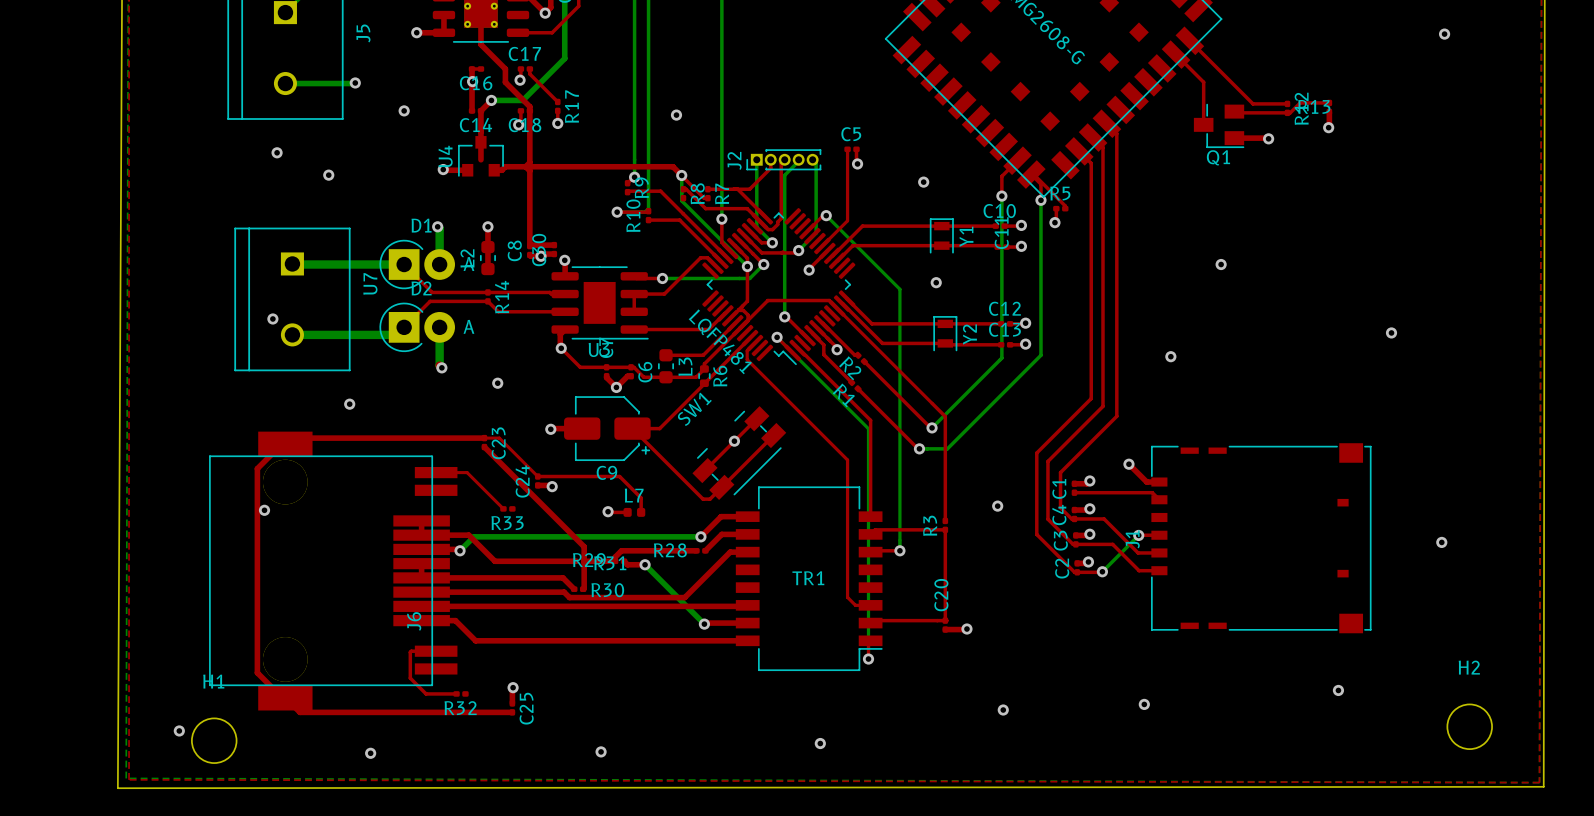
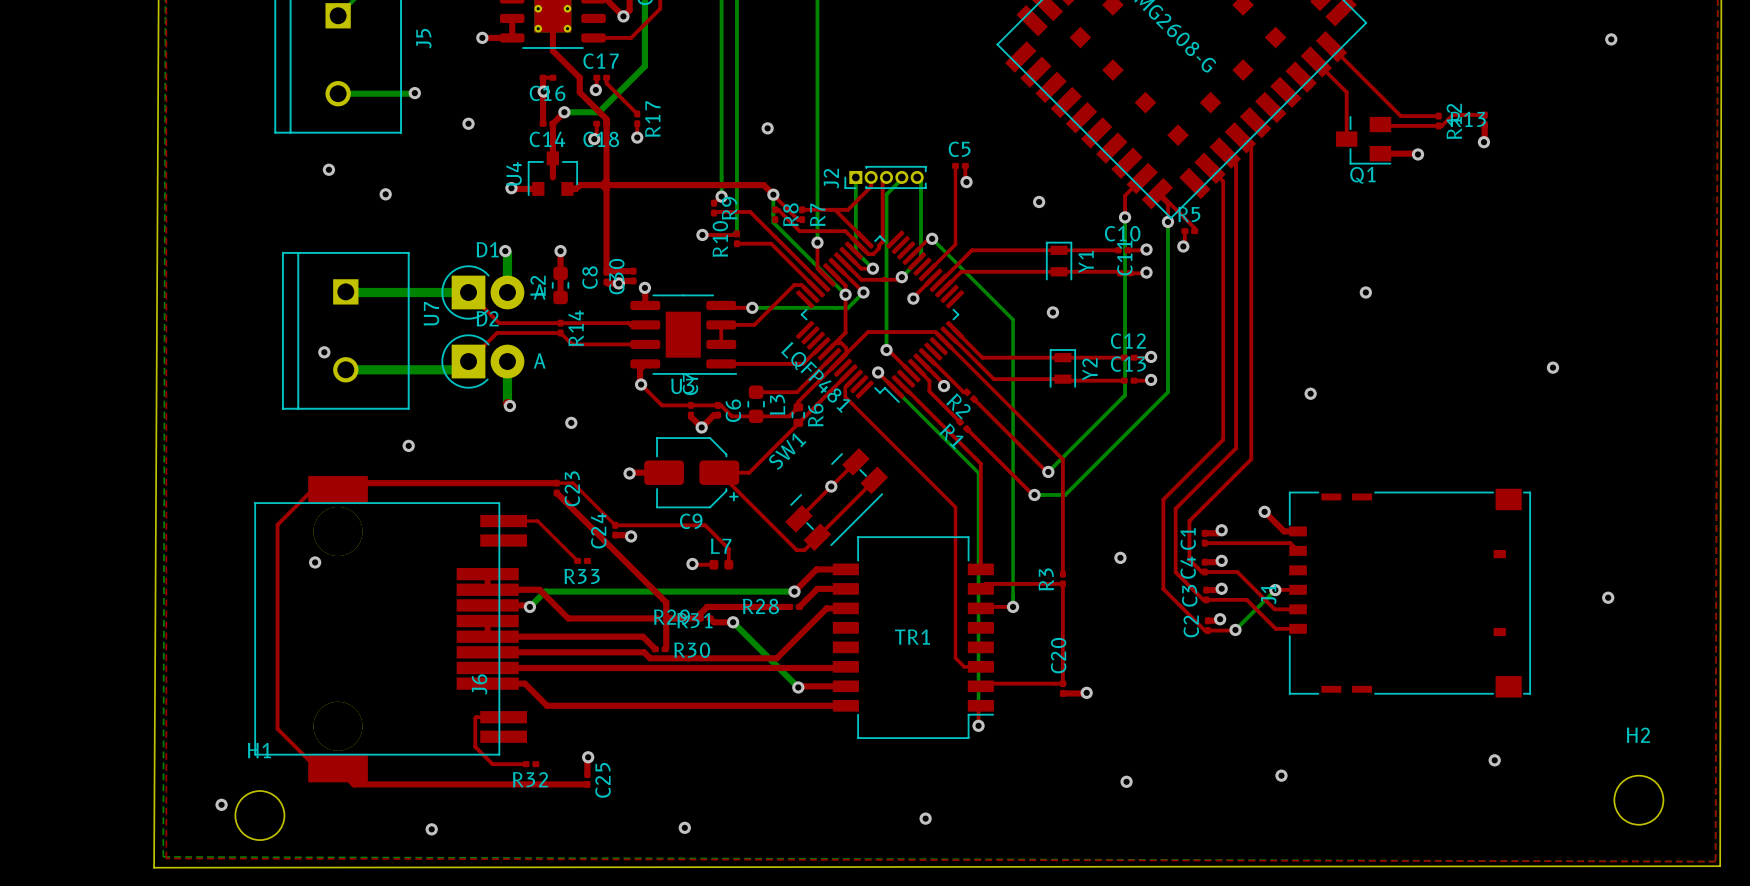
top track: (281, 444) (257, 468) (257, 672) (282, 697) -> none
top track: none -> (338, 490) (312, 490) (277, 524) (277, 728) (317, 768) (338, 768)

